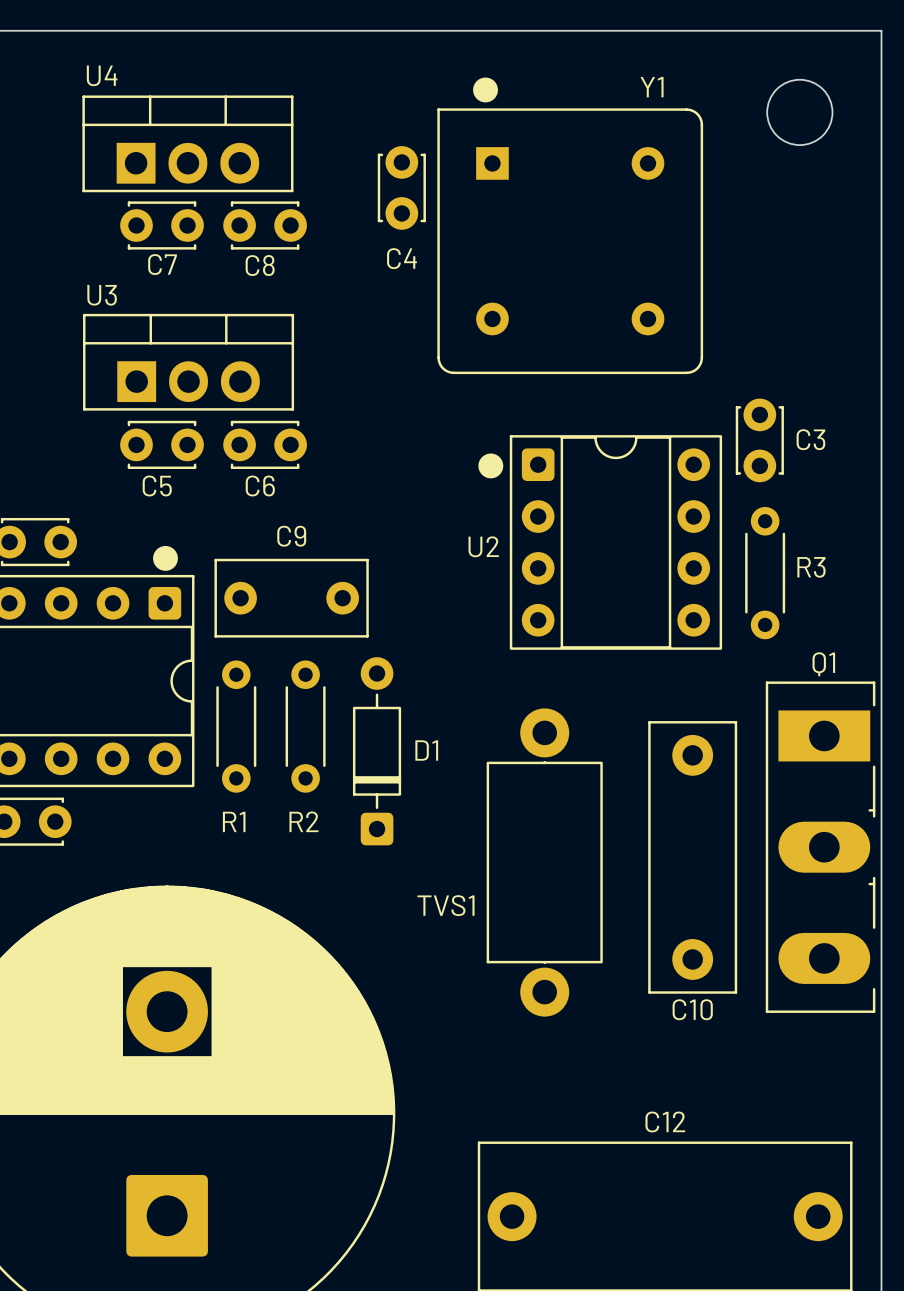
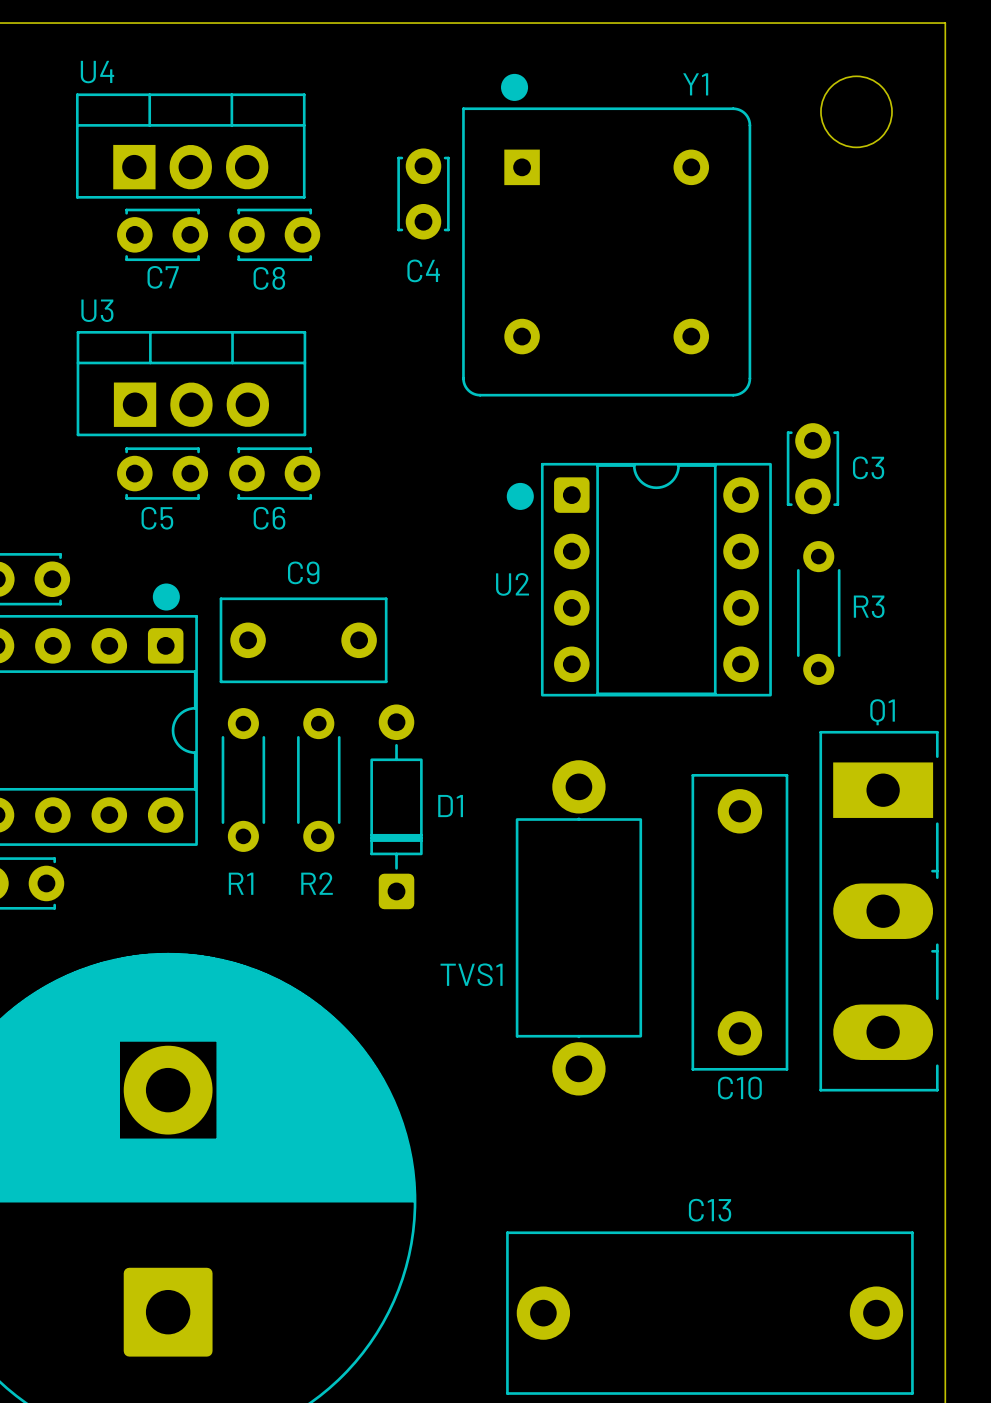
C12 name: C12 (665, 1121) -> C13 (710, 1210)

